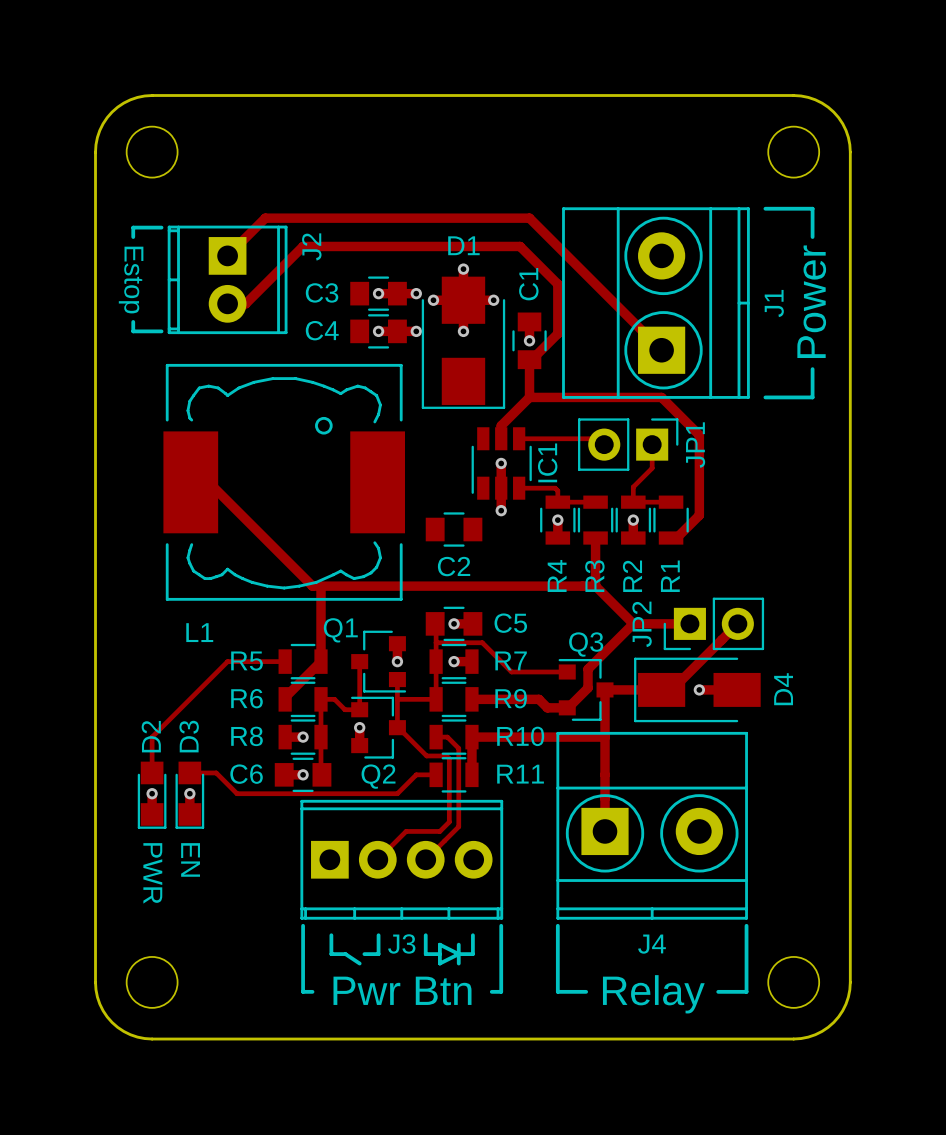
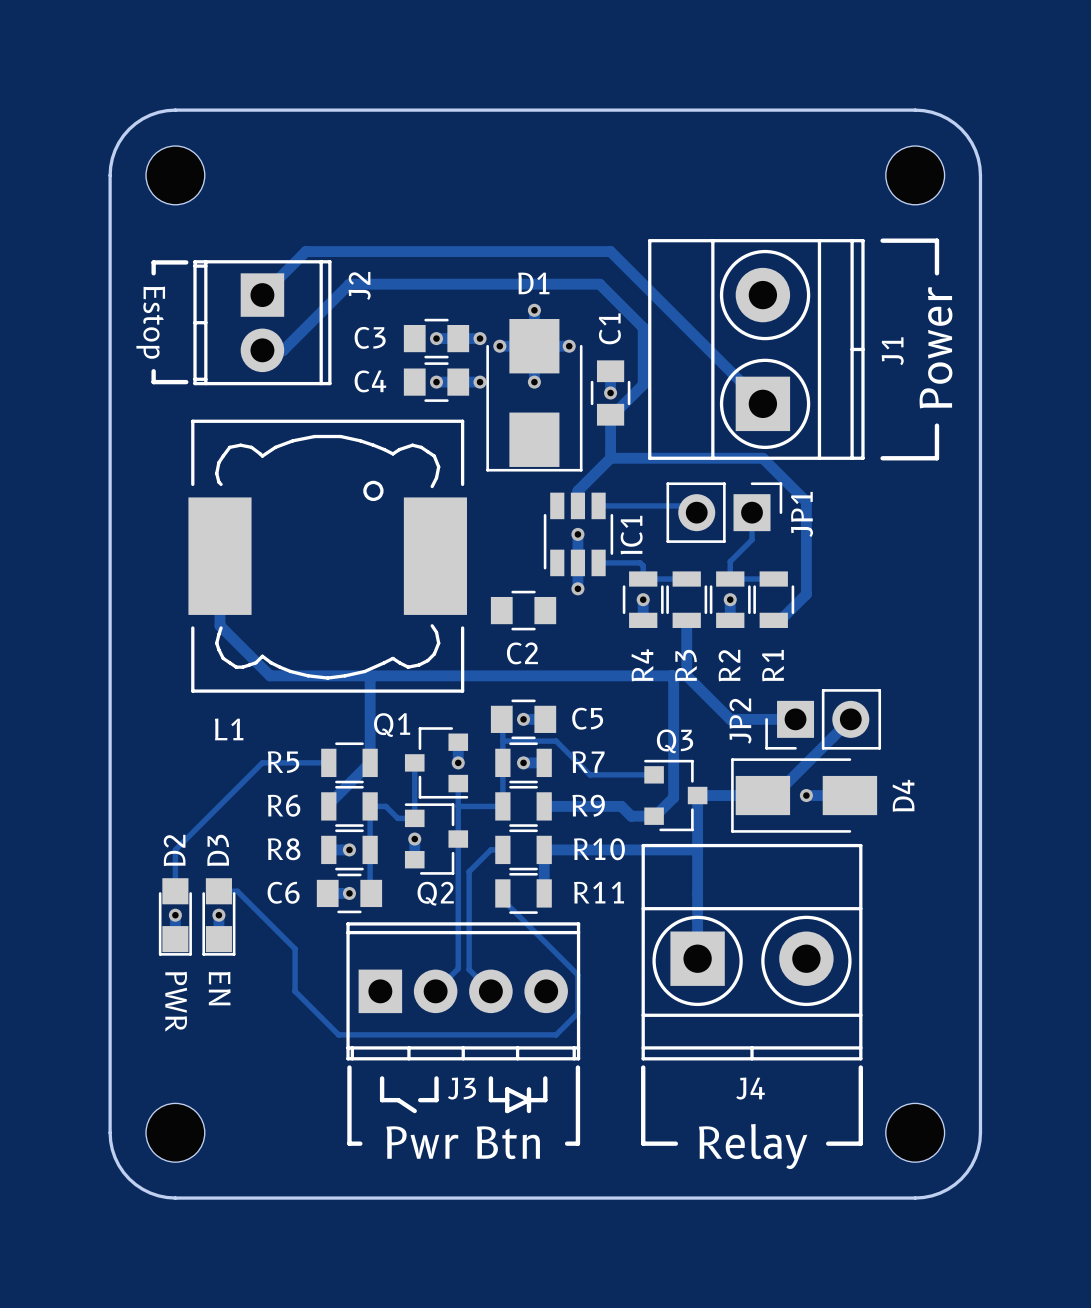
track: (190, 482) (208, 482) (312, 586) -> (219, 579) (219, 625) (270, 675) (360, 675)
track: (633, 623) (588, 669) (588, 688) (584, 691) -> (671, 675) (673, 677) (673, 797)
track: (398, 727) (426, 755) (446, 755) (449, 758) (449, 822) (439, 831) (406, 831) (397, 840) -> (458, 839) (458, 968)
track: (436, 737) (447, 737) (458, 748) (458, 826) (436, 849) -> none
track: none -> (502, 856) (502, 849) (490, 849) (469, 871) (469, 969) (490, 991)
track: (205, 772) (216, 772) (237, 793) (397, 793) (416, 774) (436, 774) -> (237, 891) (295, 948) (295, 991) (338, 1034) (556, 1034) (577, 1013) (577, 975) (502, 899)

